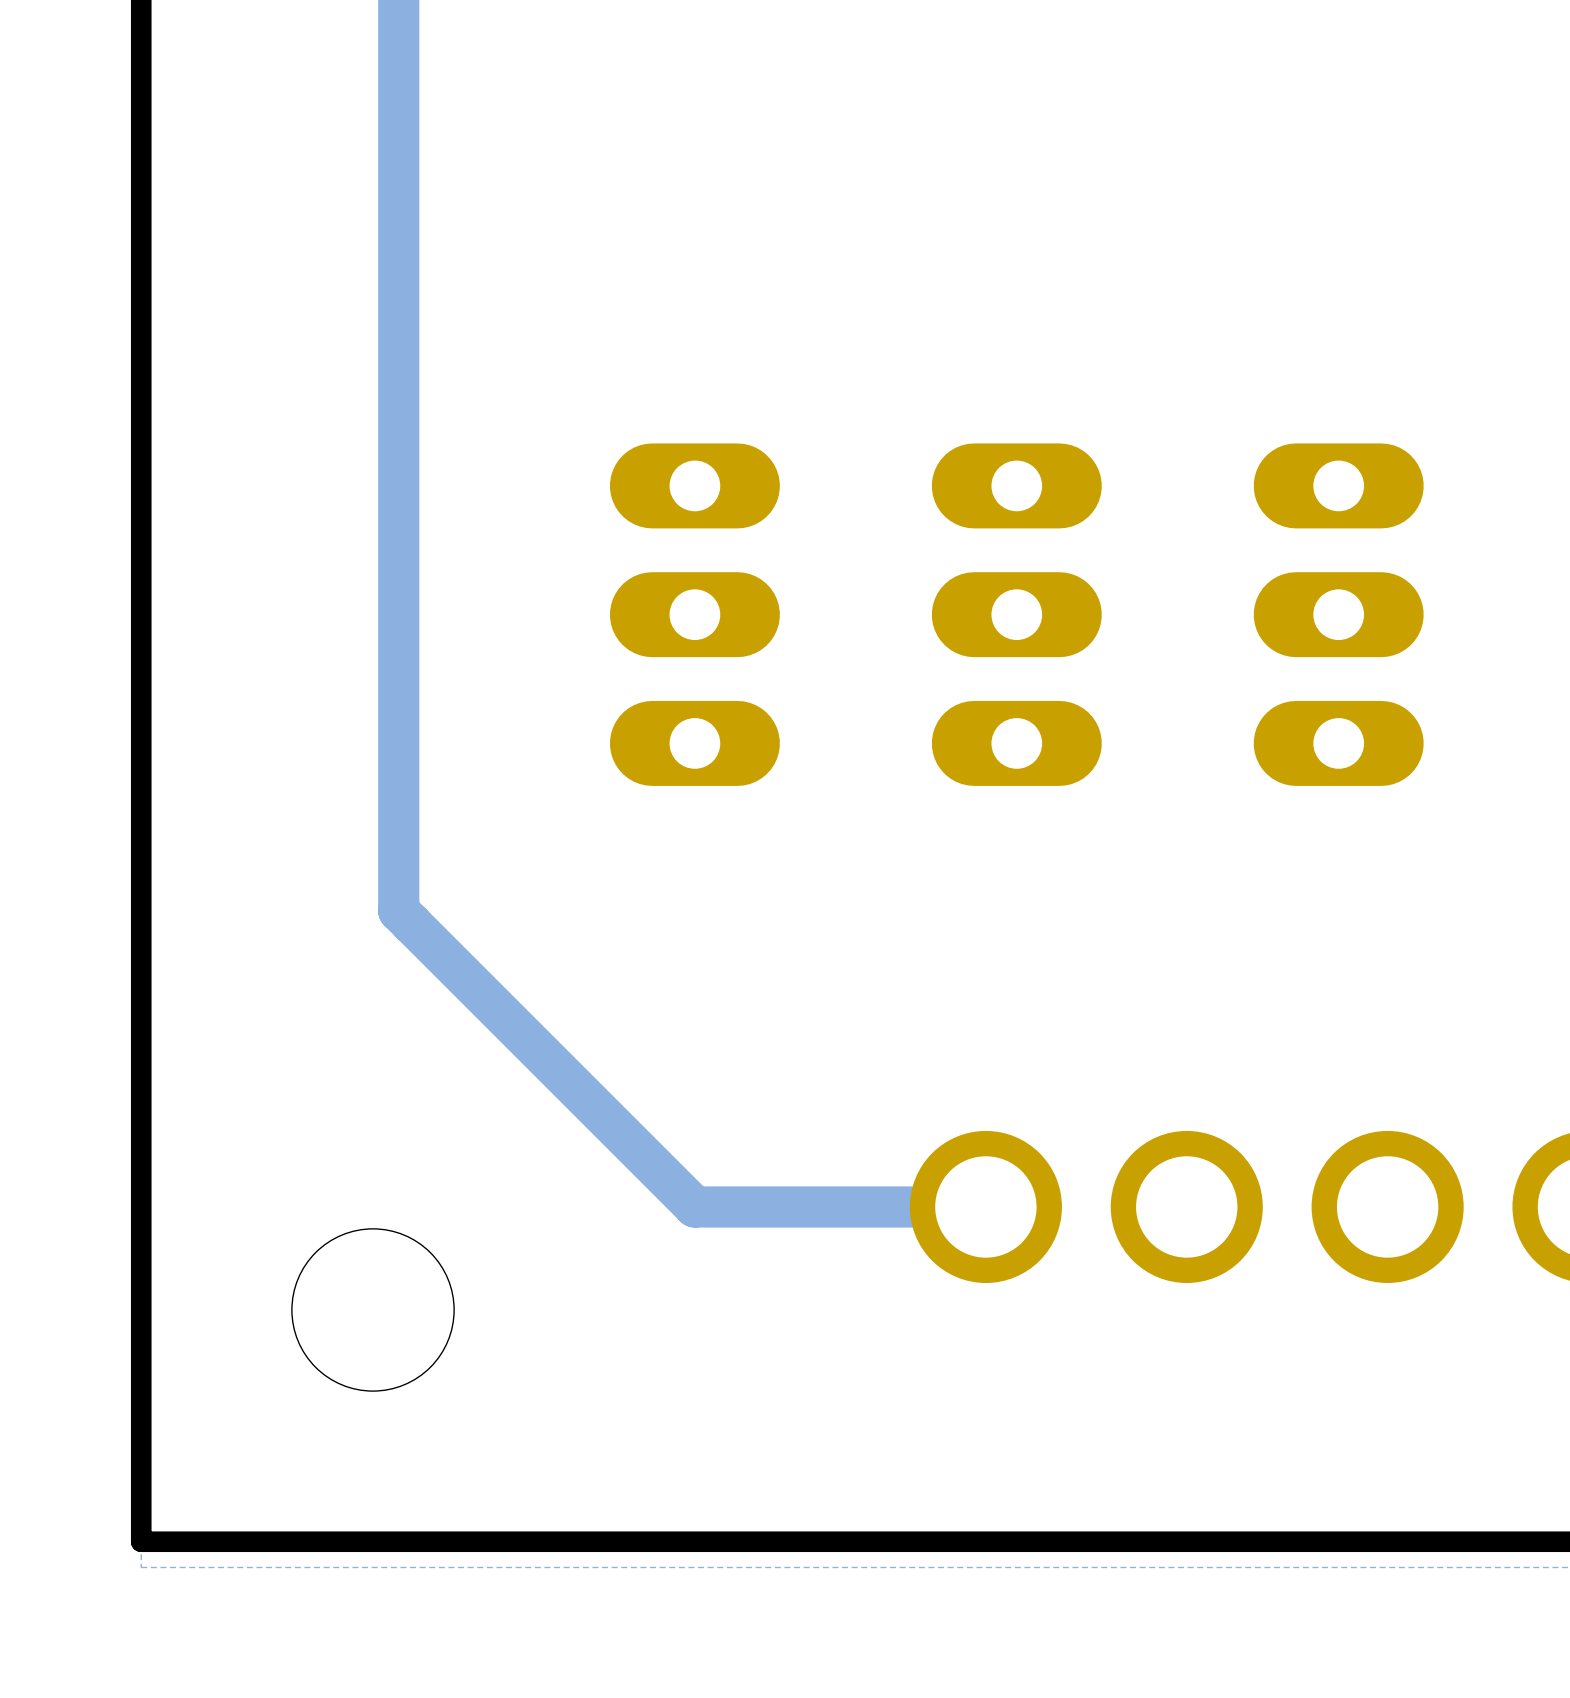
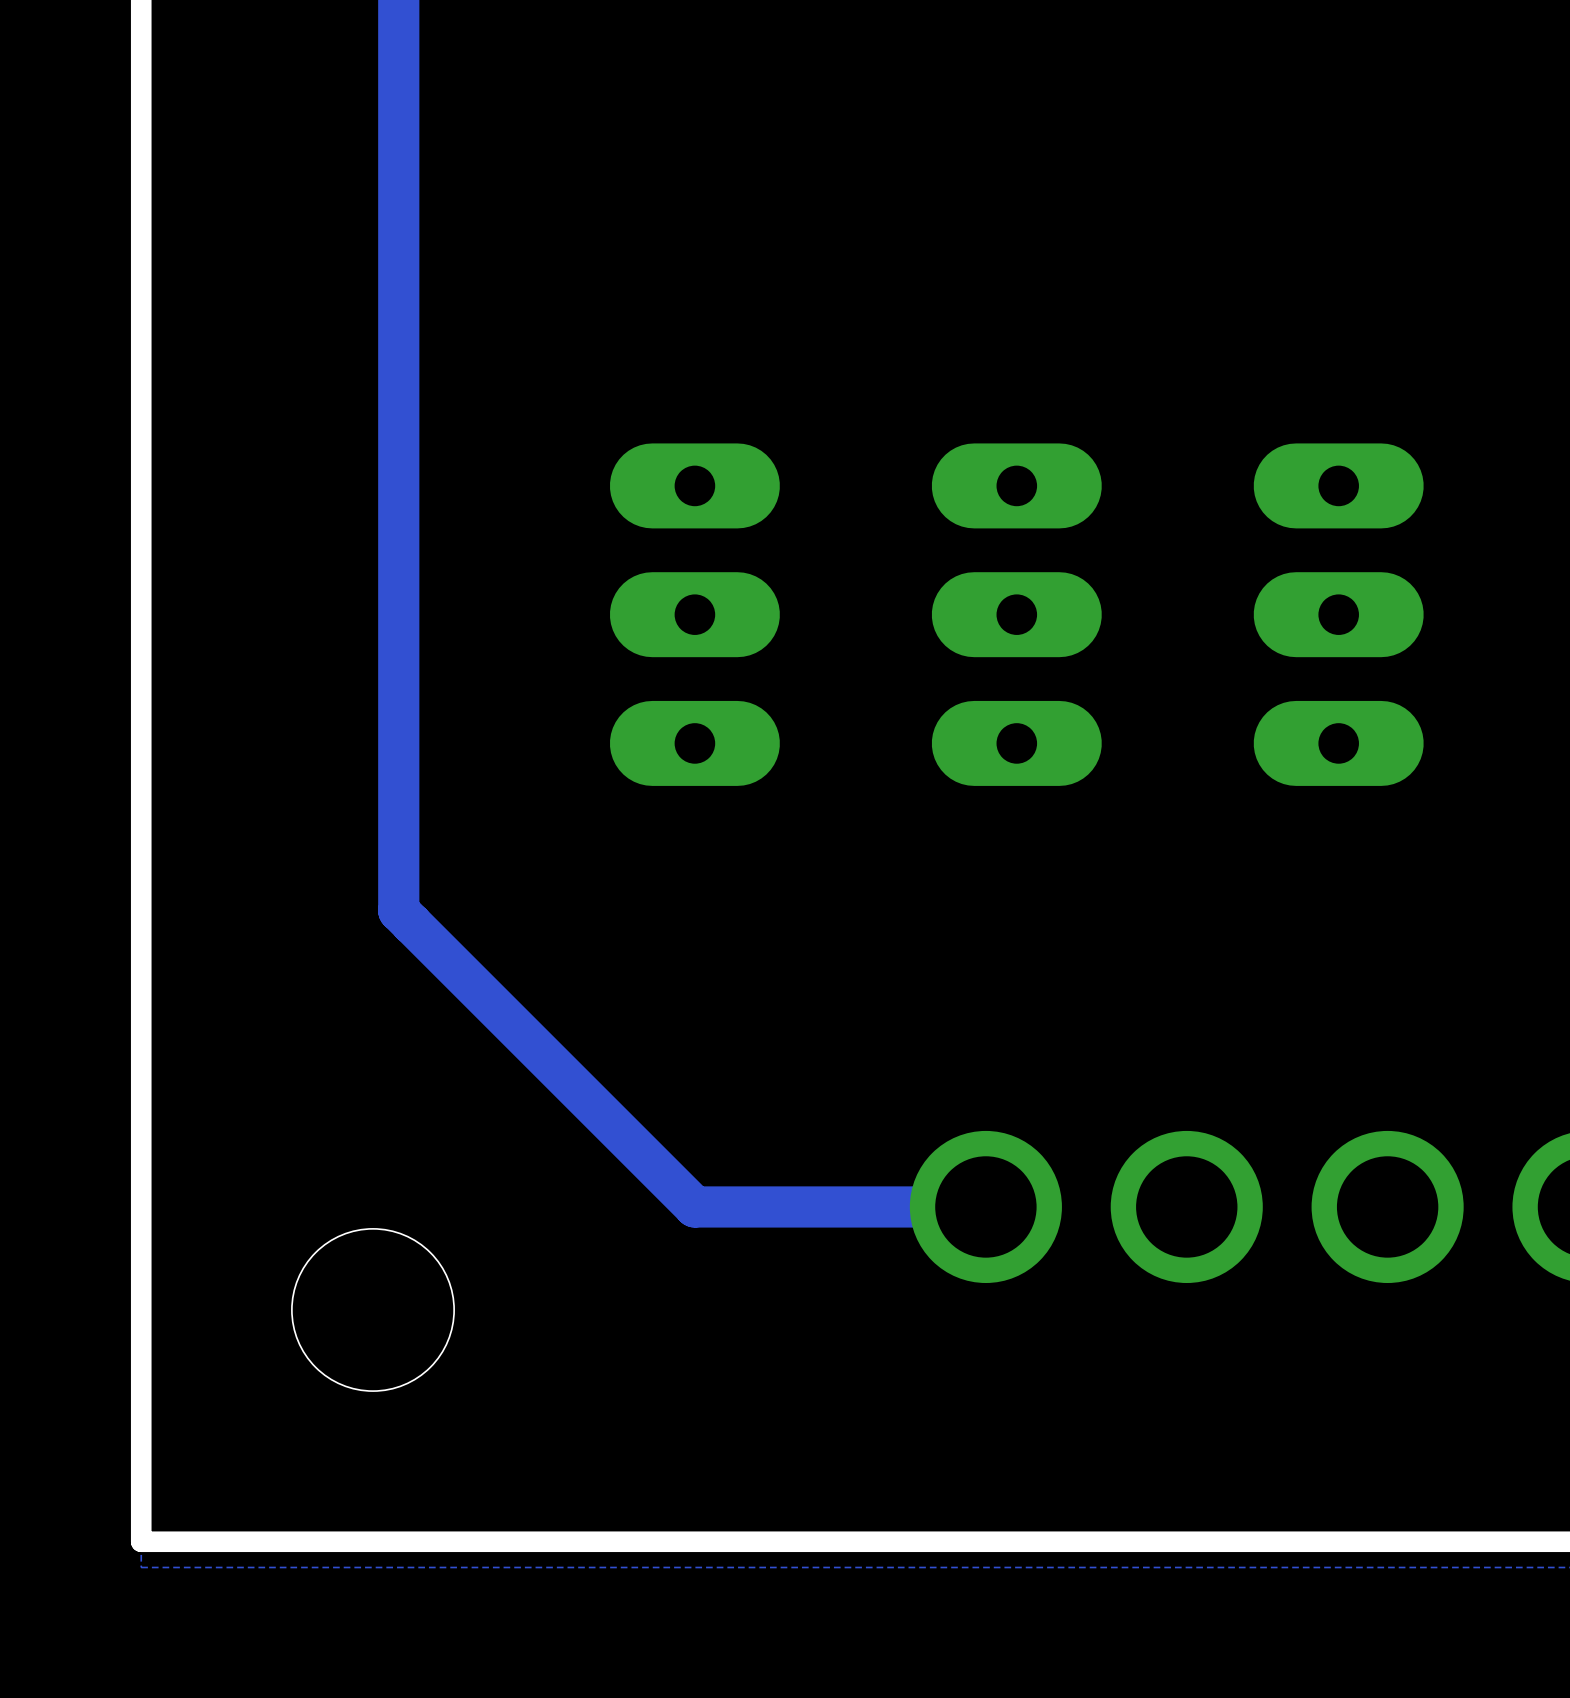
part footprint: [609, 443, 780, 786] -> [609, 443, 780, 786]
part footprint: [931, 443, 1102, 786] -> [931, 443, 1102, 786]
part footprint: [1253, 443, 1424, 786] -> [1253, 443, 1424, 786]

